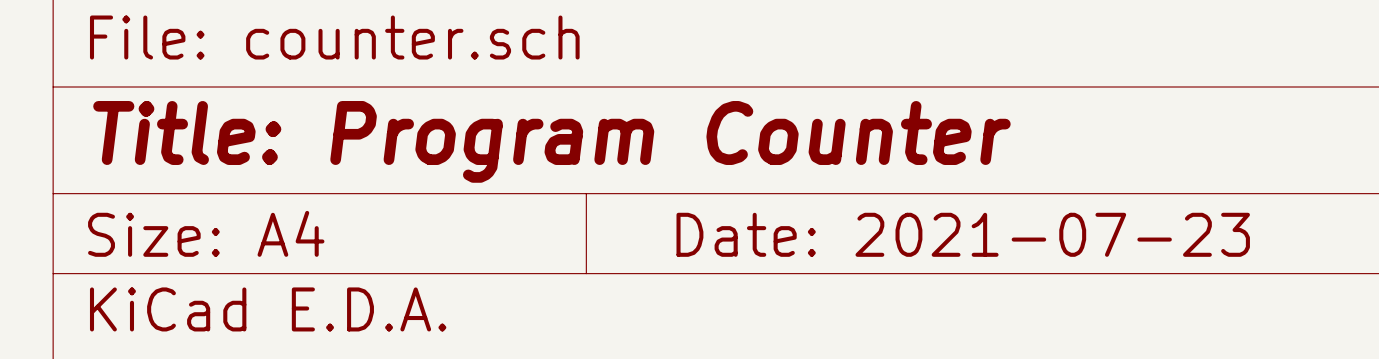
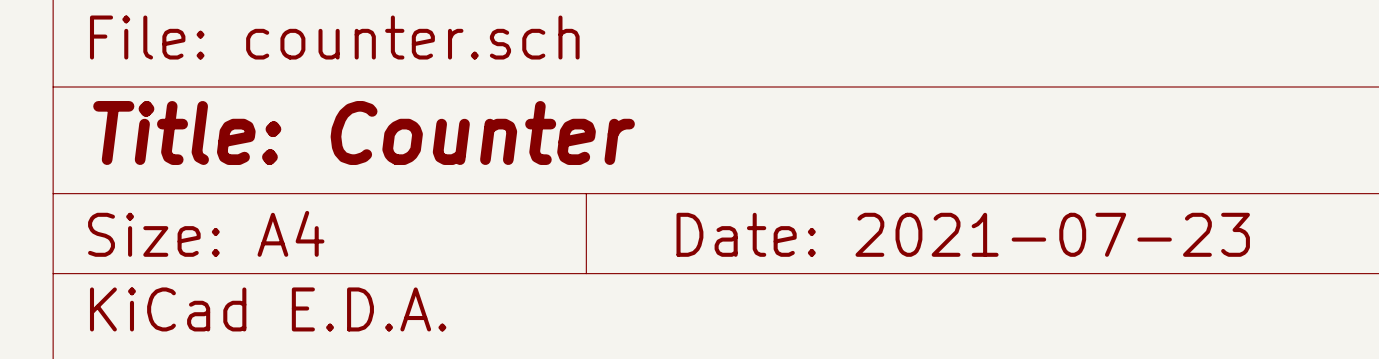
title block: Title: Program Counter (551, 141) -> Title: Counter (364, 132)

